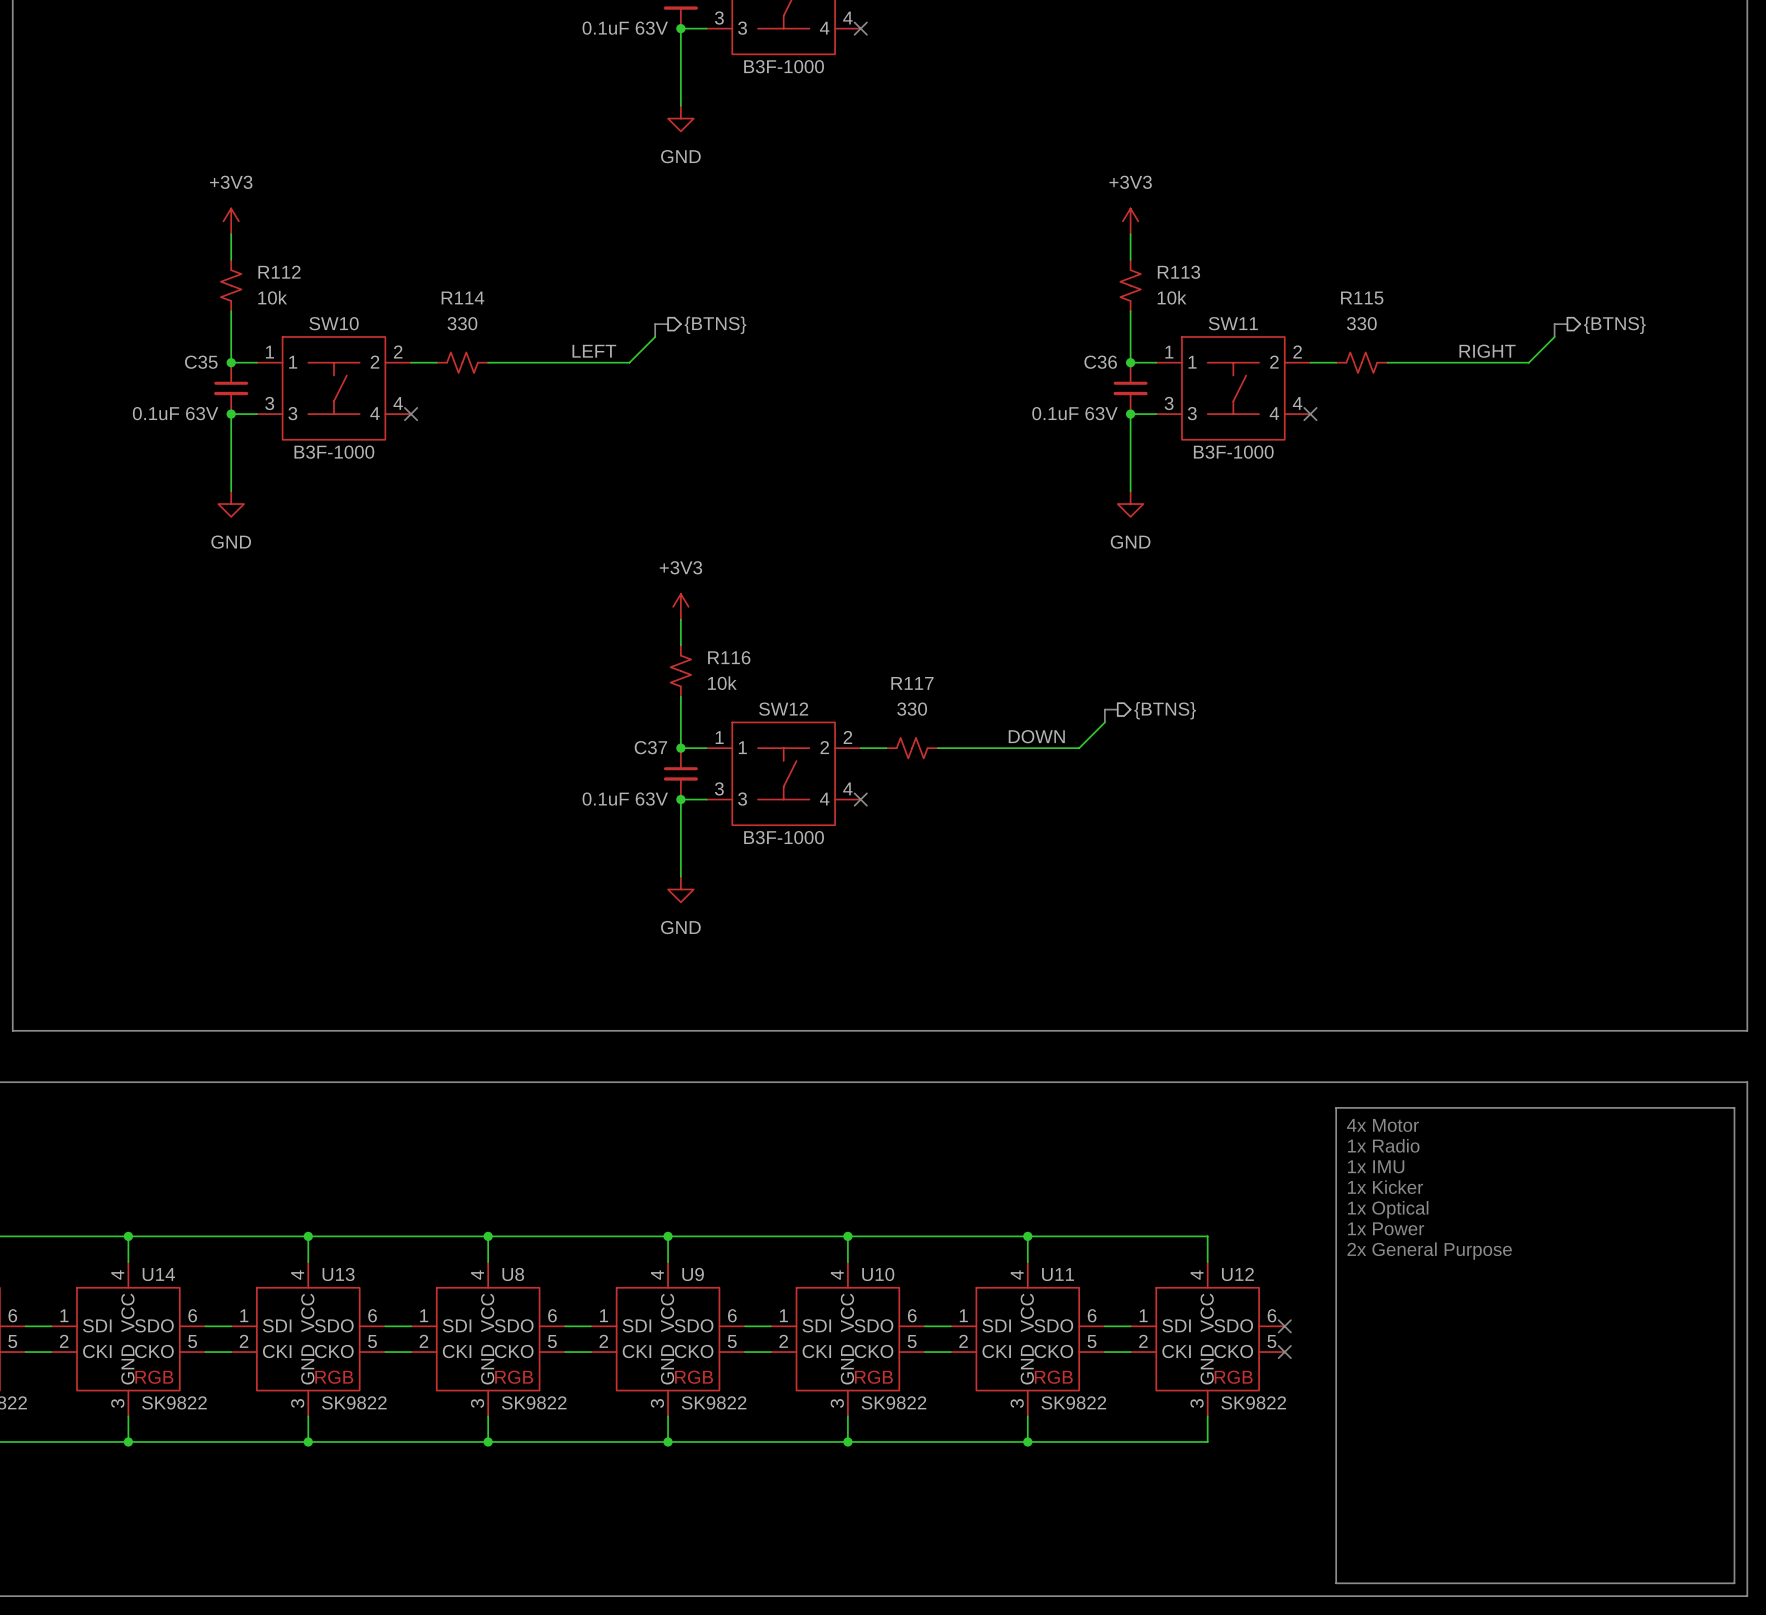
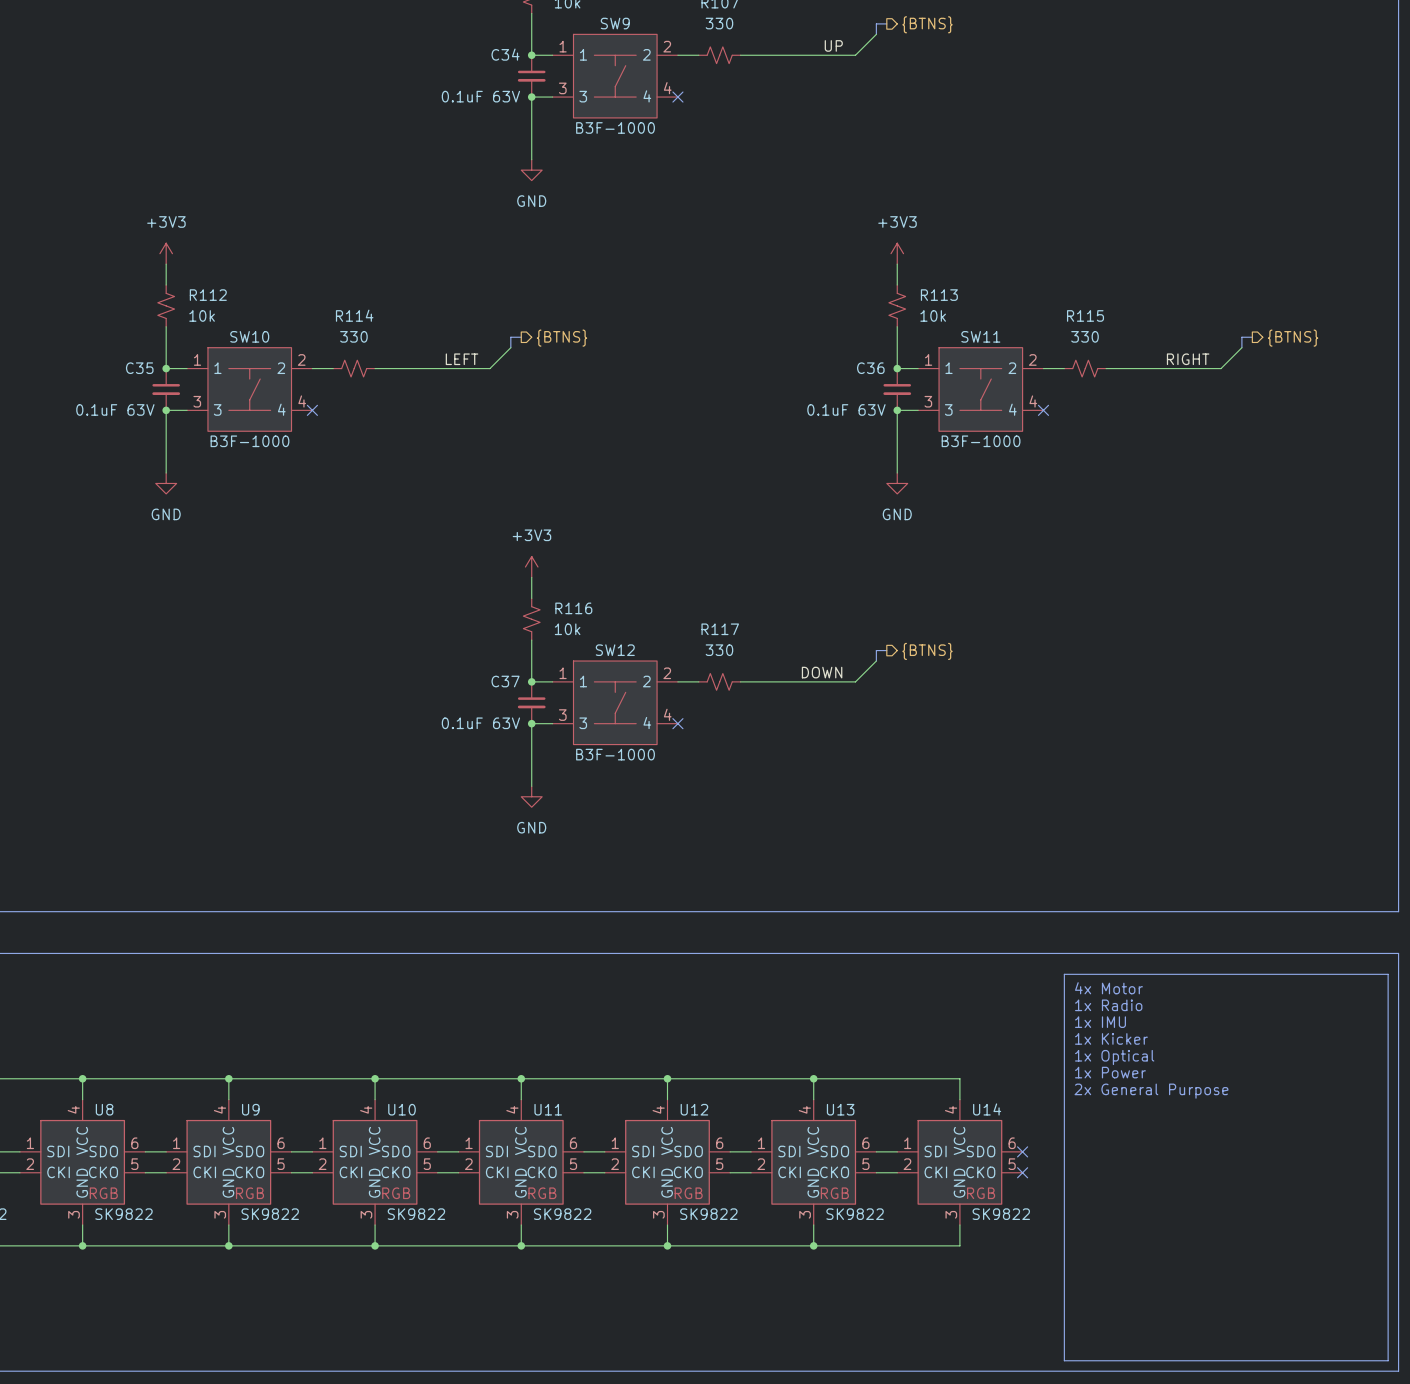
U14 name: U14 (158, 1274) -> U8 (104, 1109)
U13 name: U13 (338, 1274) -> U9 (250, 1109)
U8 name: U8 (513, 1274) -> U10 (402, 1109)
U9 name: U9 (693, 1274) -> U11 (548, 1109)
U10 name: U10 (878, 1274) -> U12 (694, 1109)
U11 name: U11 (1058, 1274) -> U13 (840, 1109)
U12 name: U12 (1237, 1274) -> U14 (987, 1109)

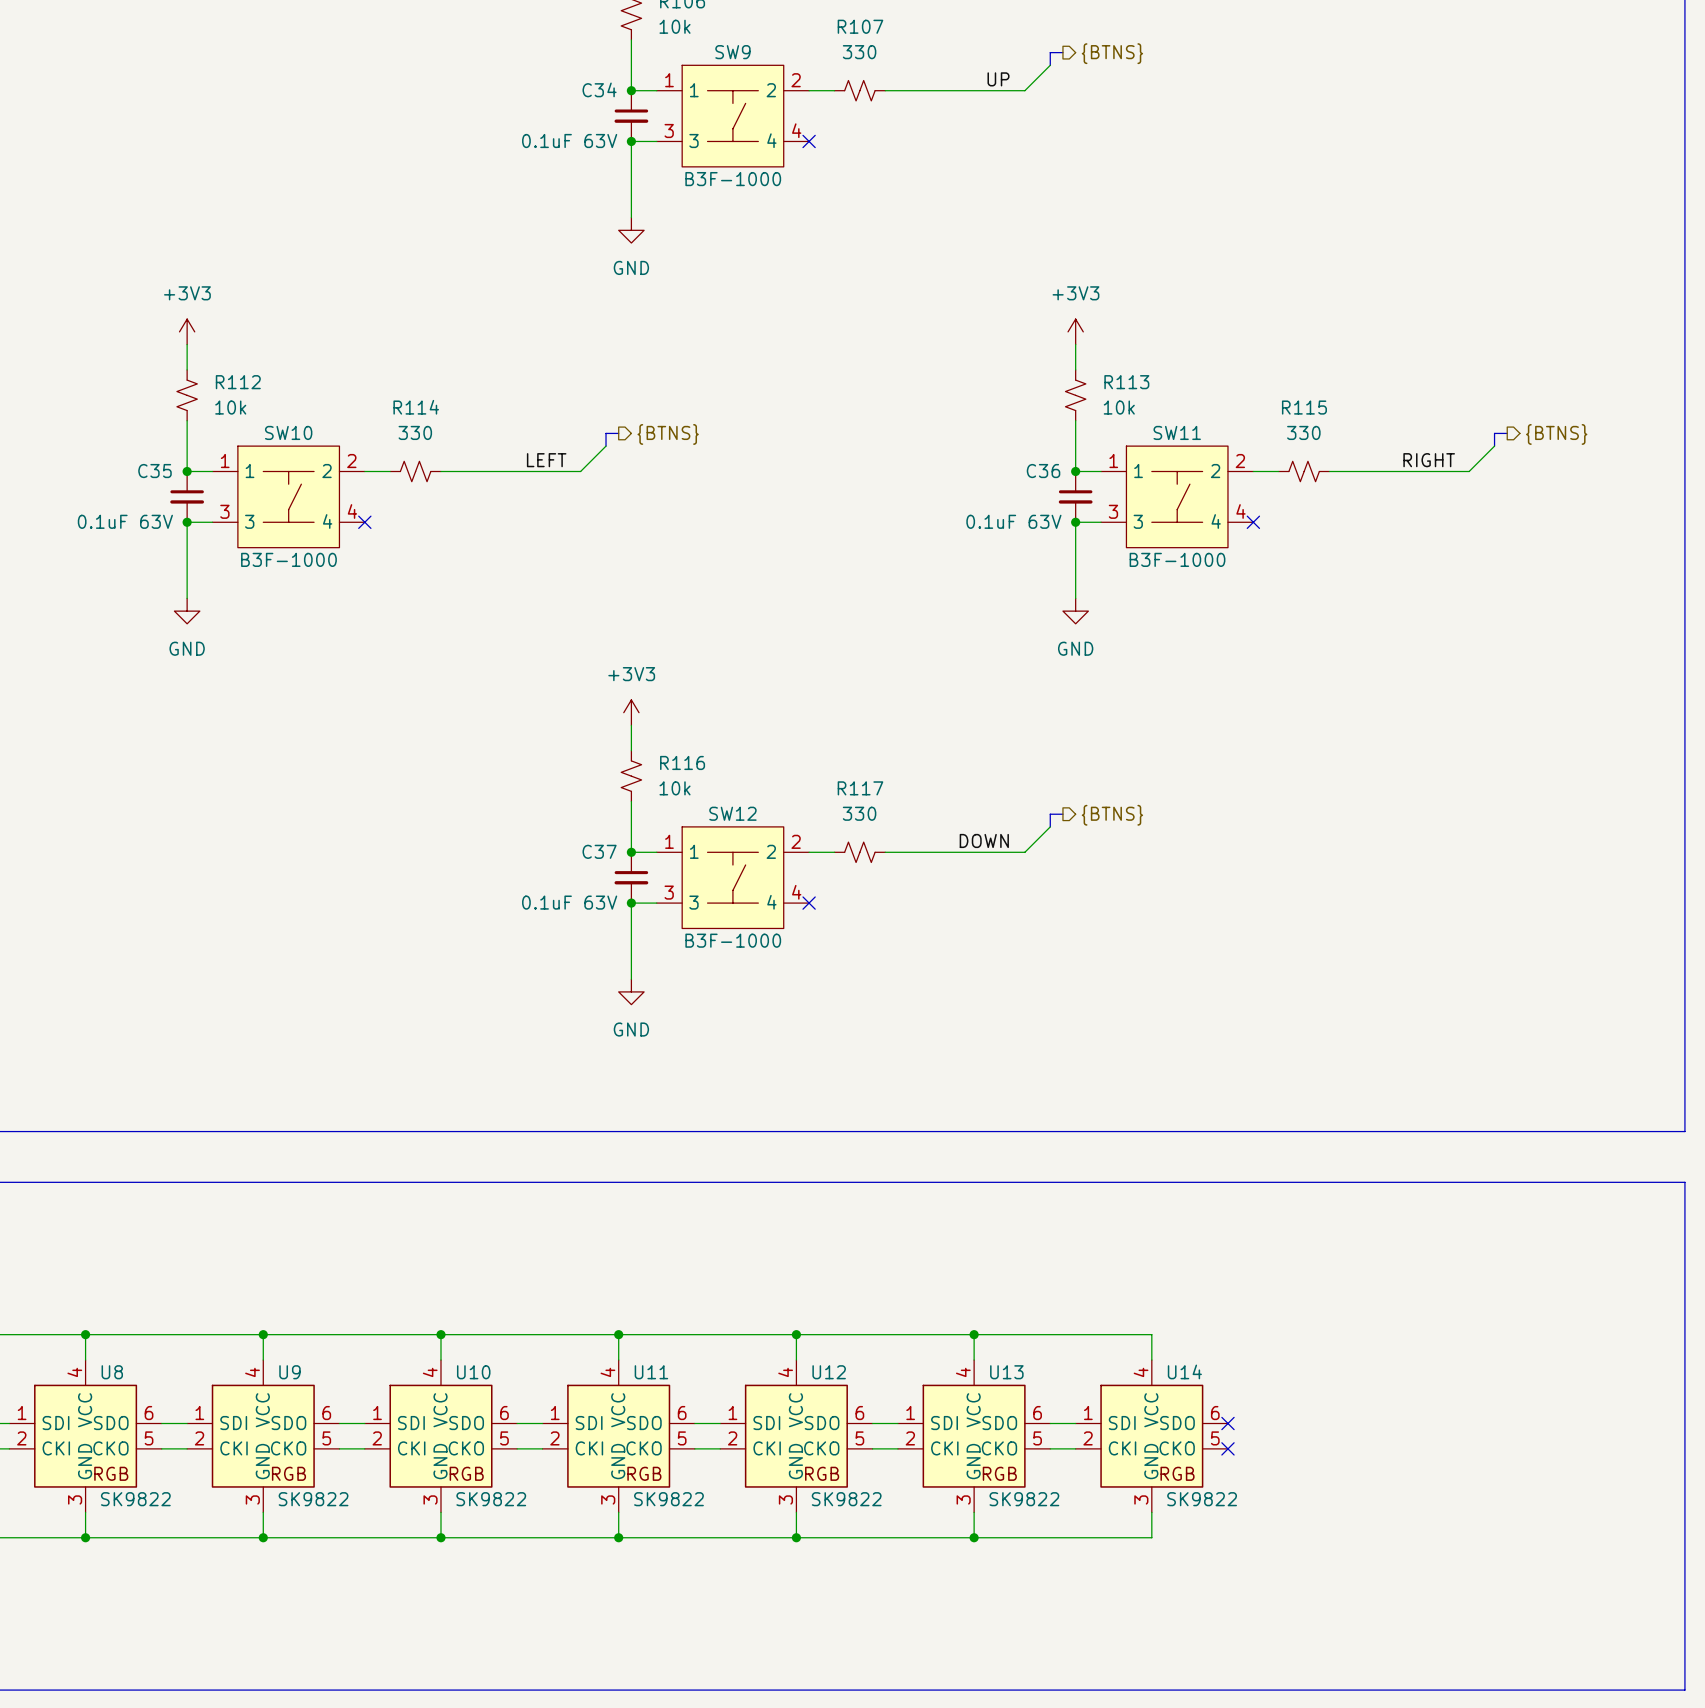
line: (1064, 974) (1388, 974) (1388, 1360) (1064, 1360) (1064, 974) -> none
text: 4x Motor (1108, 988) -> none
text: 1x Radio (1108, 1005) -> none
text: 1x IMU (1100, 1022) -> none
text: 1x Kicker (1111, 1038) -> none
text: 1x Optical (1114, 1057) -> none
text: 1x Power (1110, 1072) -> none
text: 2x General Purpose (1151, 1091) -> none

